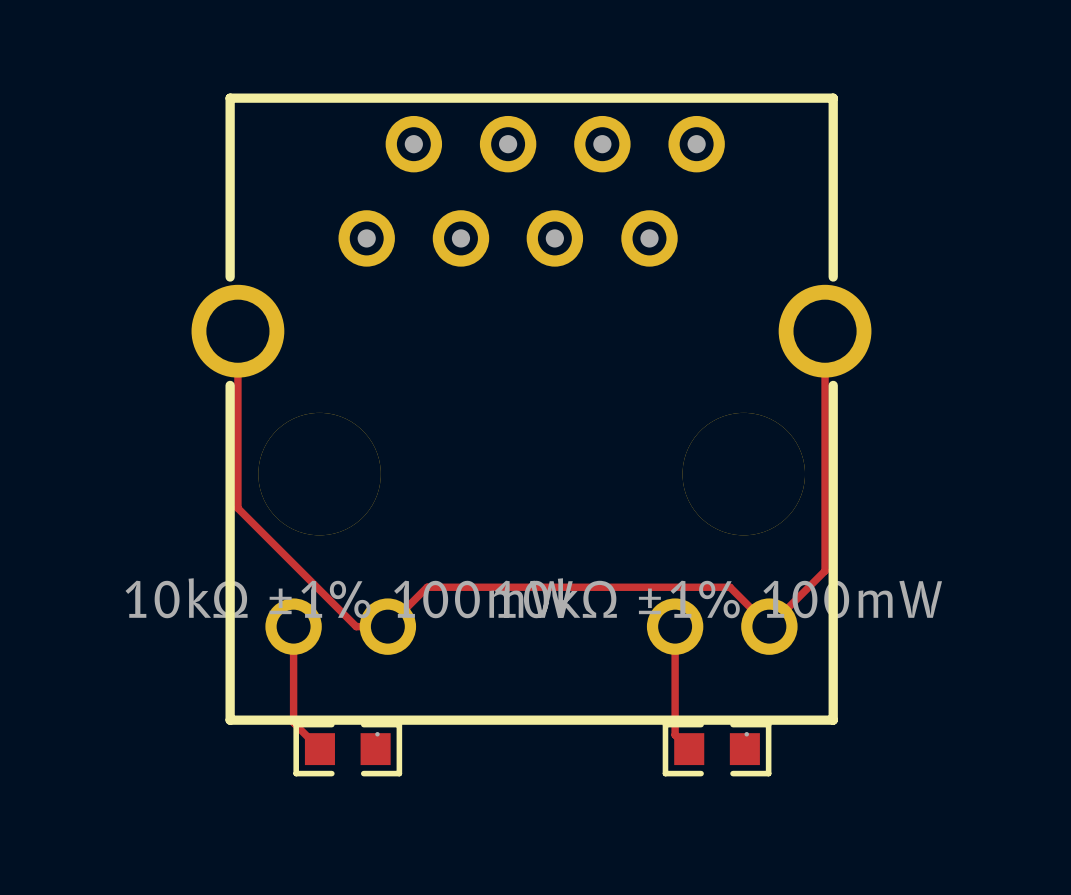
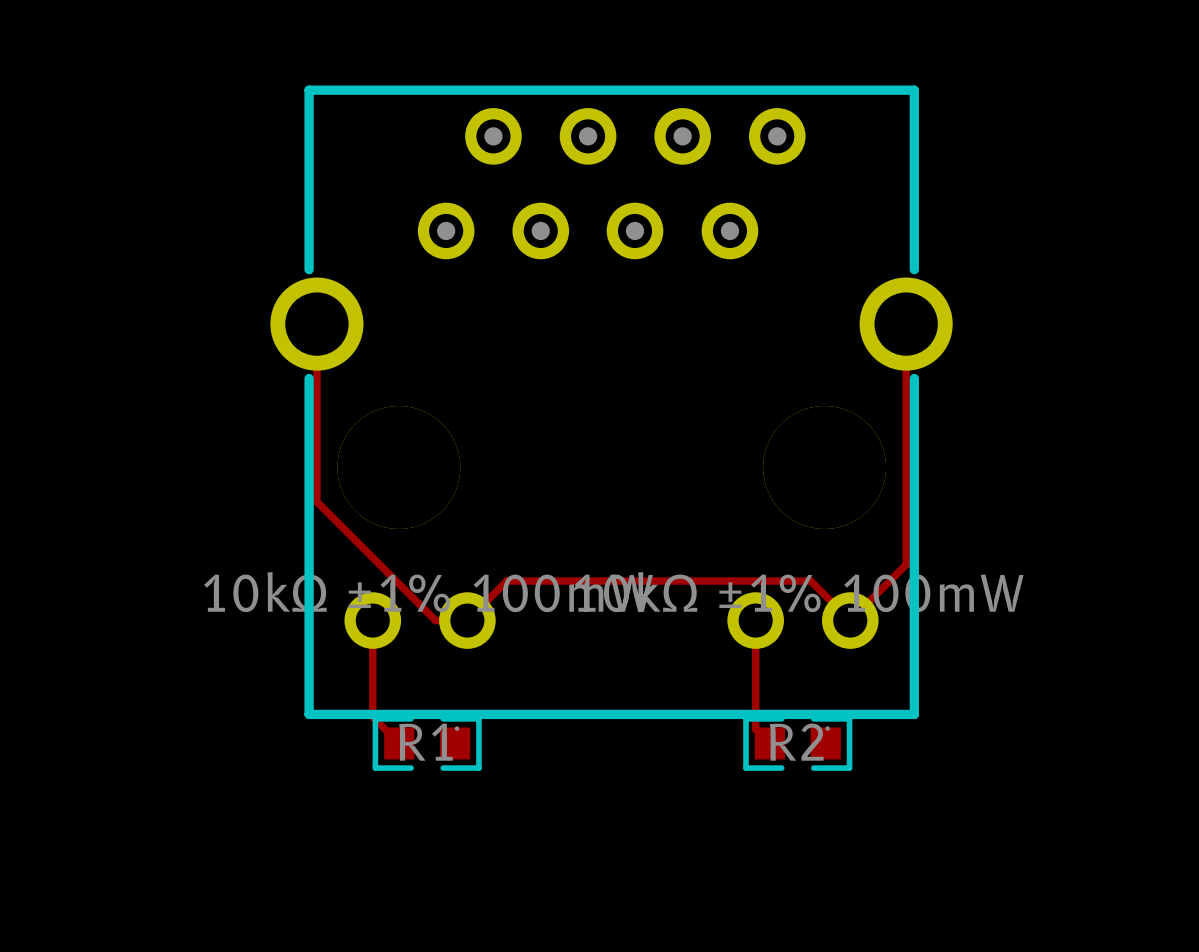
R1 name: none -> R1 (426, 742)
R2 name: none -> R2 (796, 742)

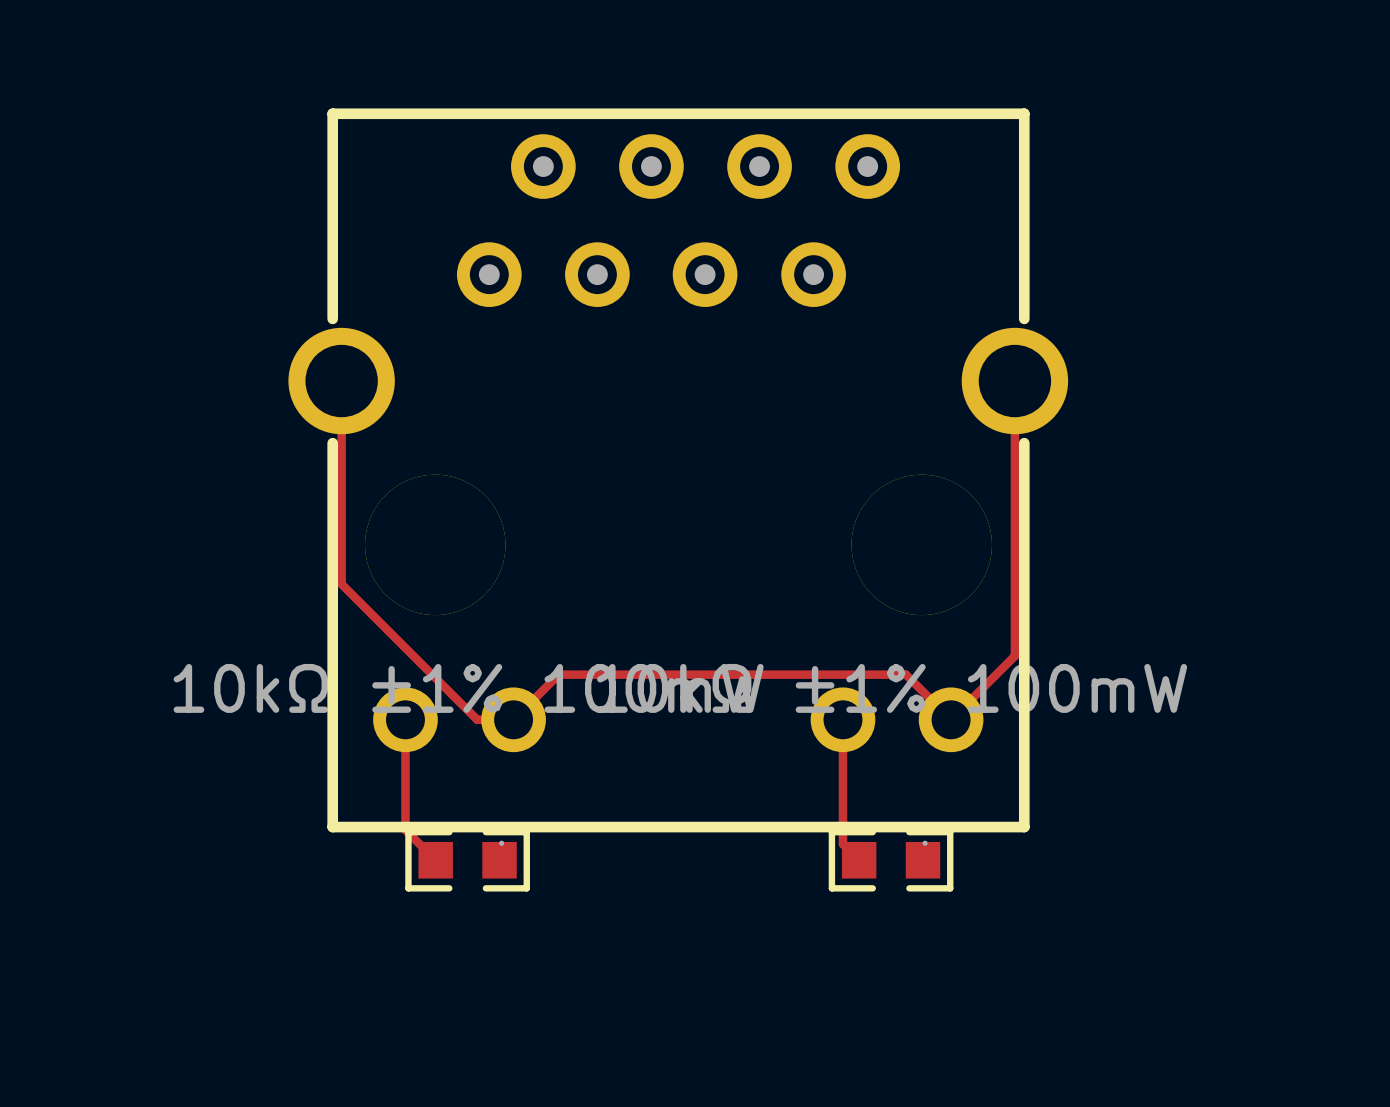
R1 name: R1 (426, 742) -> none
R2 name: R2 (796, 742) -> none

